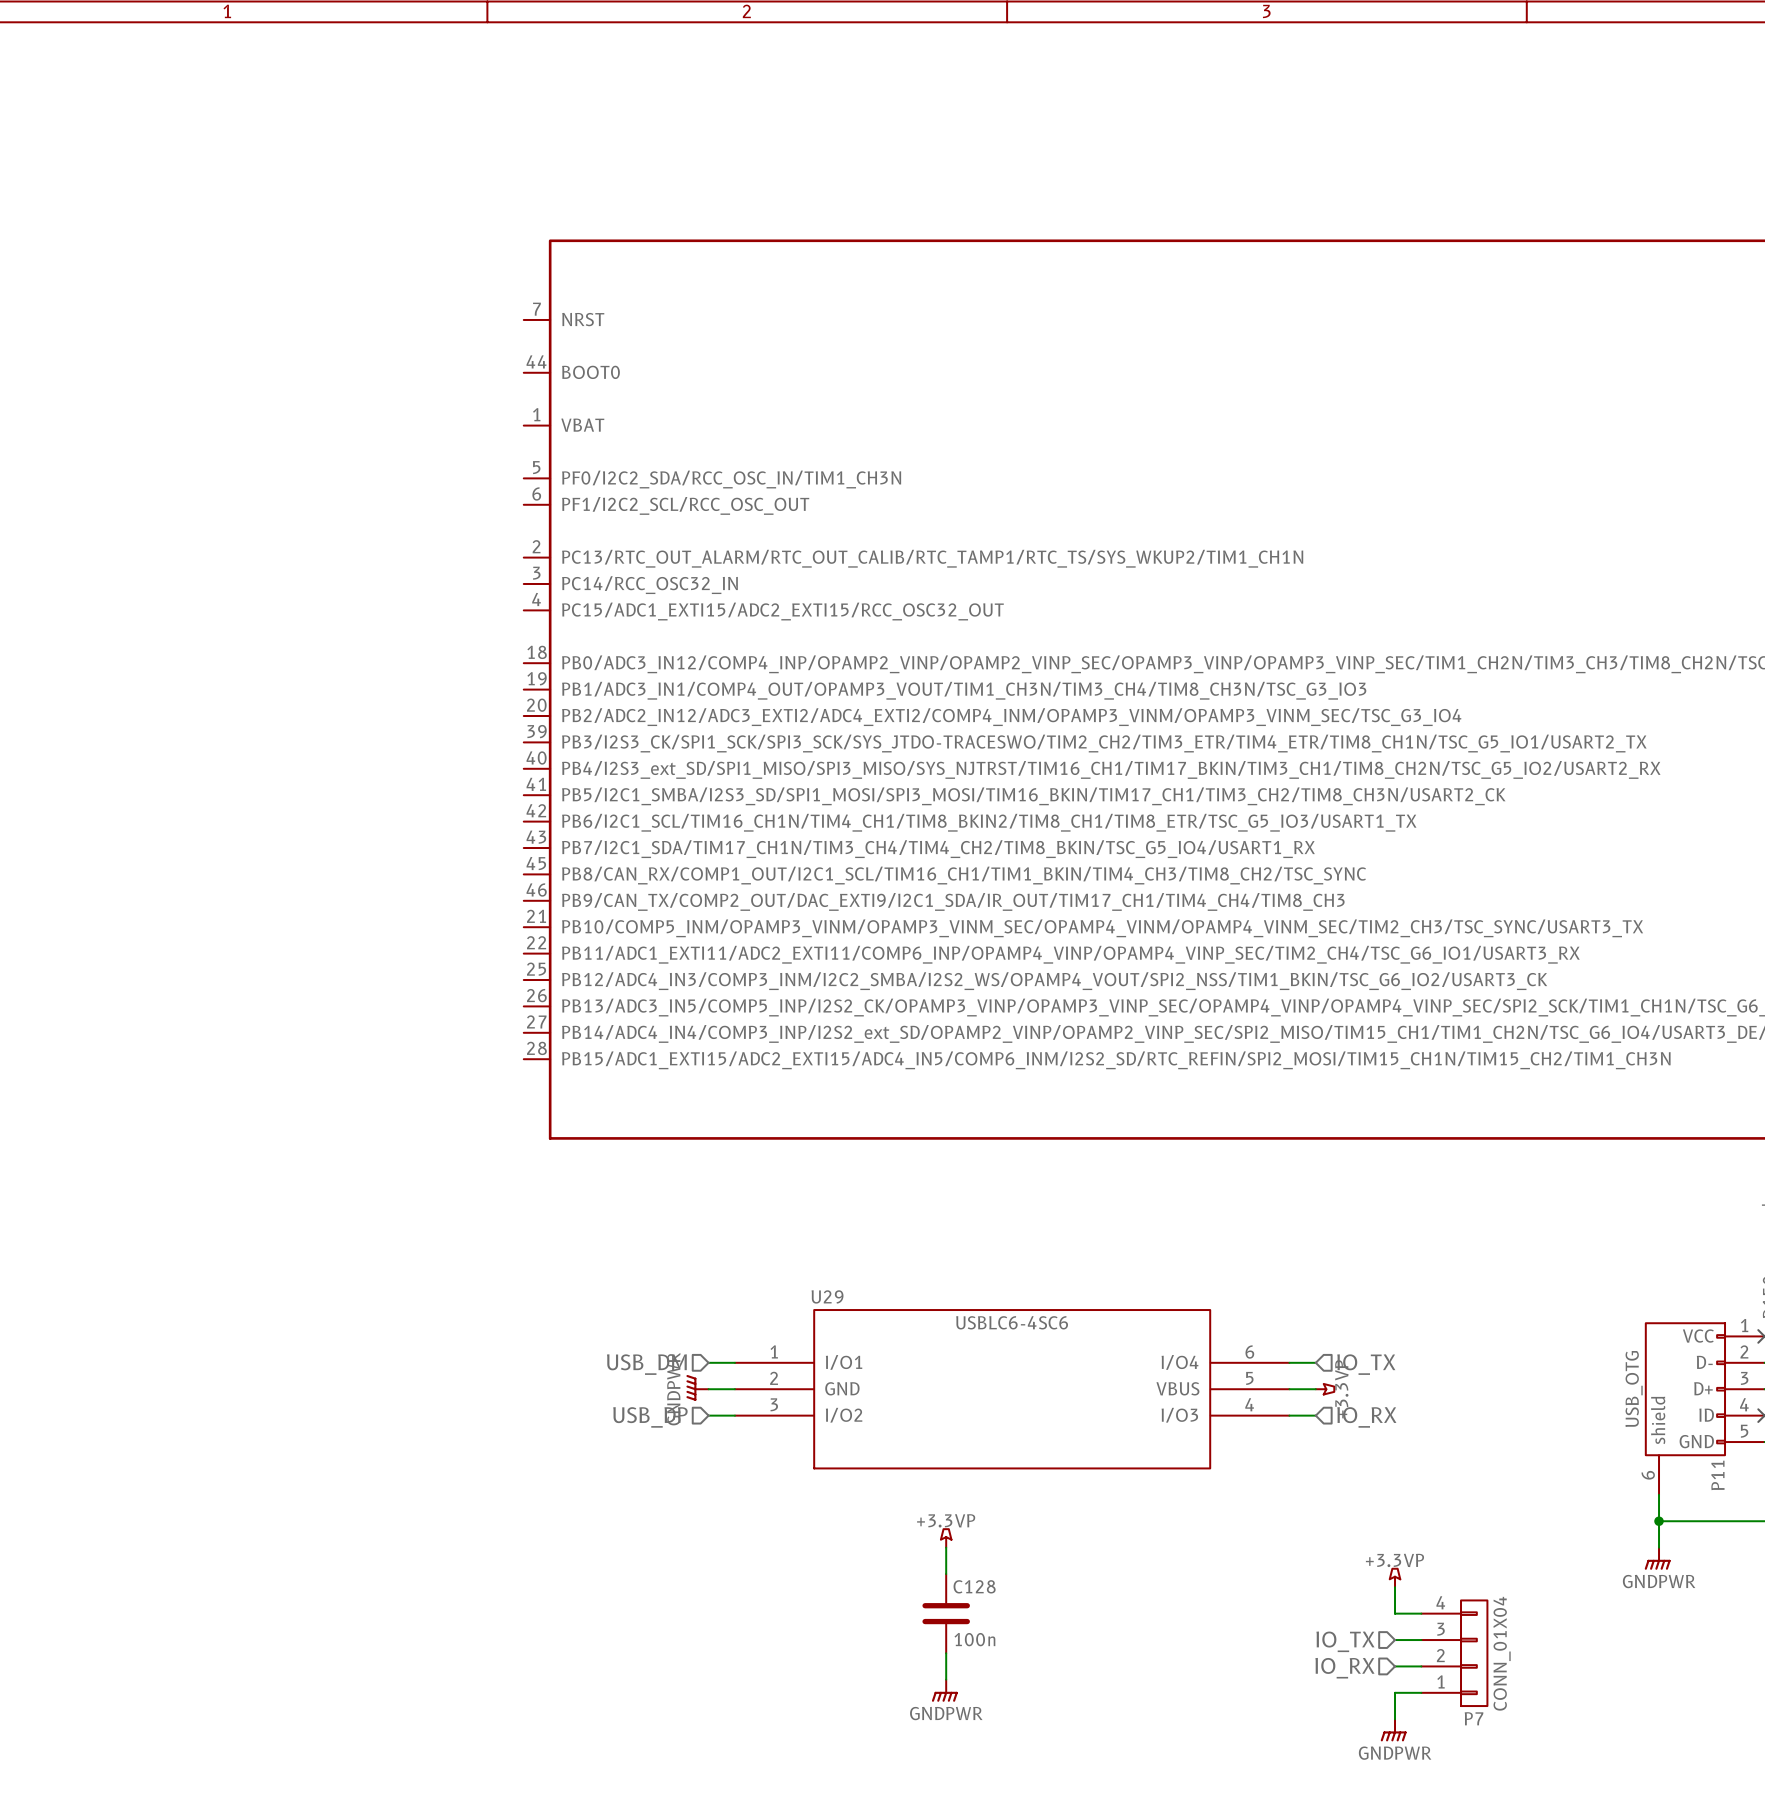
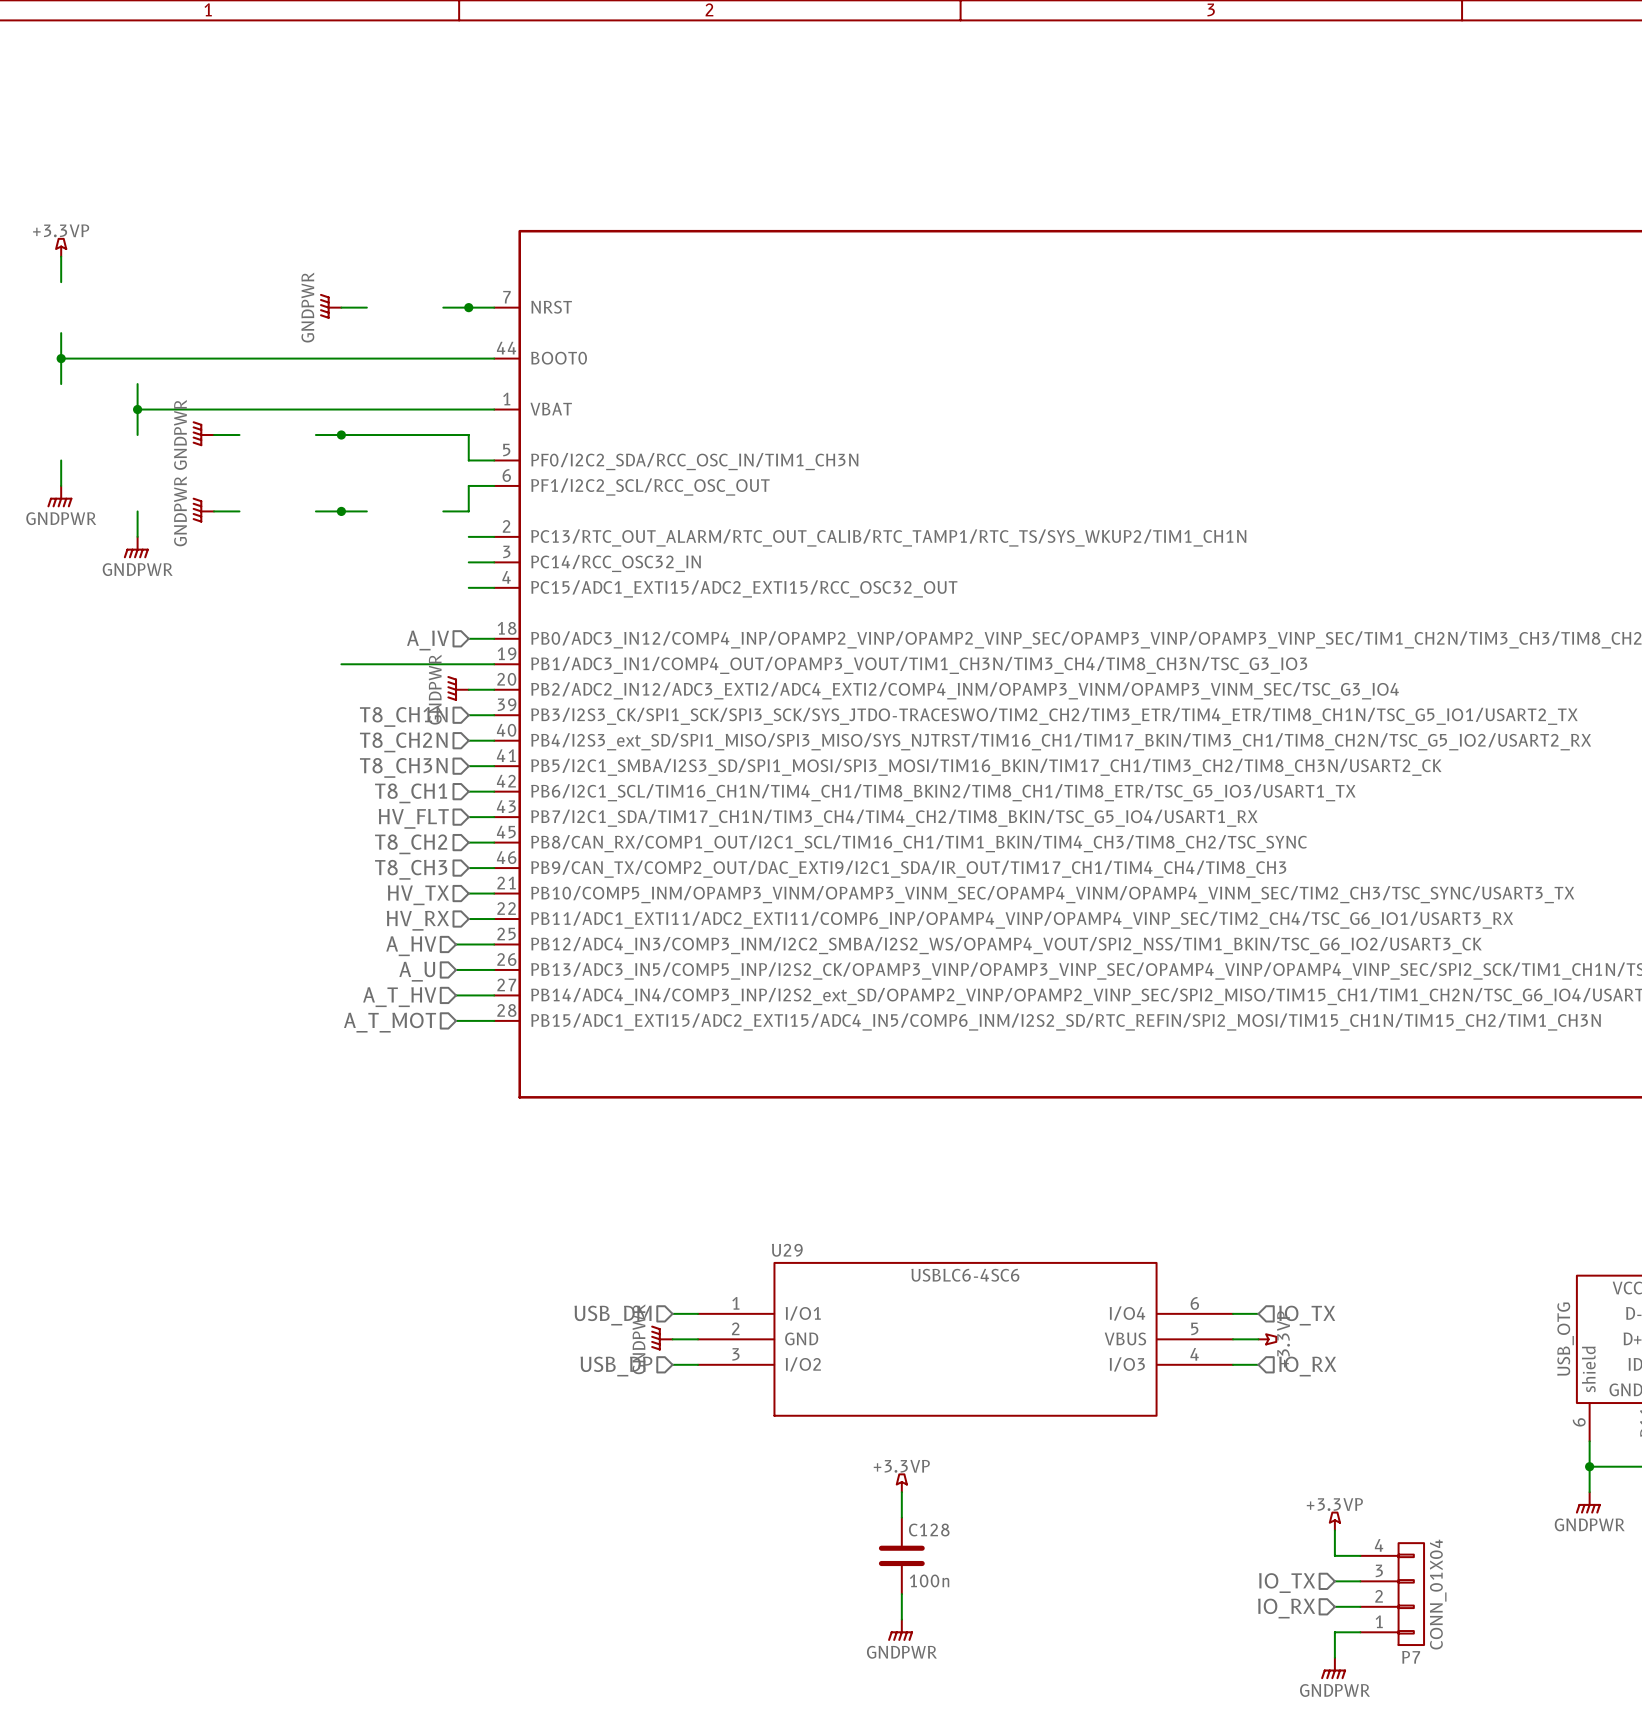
power symbol: none -> +3.3VP (61, 247)
wire: none -> (61, 256) (61, 282)
power symbol: none -> GNDPWR (330, 306)
wire: none -> (341, 307) (366, 307)
wire: none -> (443, 307) (494, 307)
junction: none -> (468, 307)
wire: none -> (61, 333) (61, 384)
wire: none -> (61, 358) (494, 358)
junction: none -> (61, 358)
wire: none -> (137, 384) (137, 435)
wire: none -> (137, 409) (494, 409)
junction: none -> (137, 409)
power symbol: none -> GNDPWR (203, 433)
wire: none -> (214, 435) (239, 435)
wire: none -> (315, 435) (468, 435) (468, 460) (494, 460)
junction: none -> (341, 435)
wire: none -> (61, 460) (61, 485)
wire: none -> (494, 485) (468, 485) (468, 511) (443, 511)
power symbol: none -> GNDPWR (59, 496)
power symbol: none -> GNDPWR (203, 510)
wire: none -> (137, 511) (137, 536)
wire: none -> (214, 511) (239, 511)
wire: none -> (315, 511) (366, 511)
junction: none -> (341, 511)
wire: none -> (468, 536) (494, 536)
power symbol: none -> GNDPWR (136, 547)
wire: none -> (468, 562) (494, 562)
wire: none -> (468, 587) (494, 587)
wire: none -> (468, 638) (494, 638)
hierarchical label: none -> A_IV (428, 640)
wire: none -> (341, 664) (494, 664)
power symbol: none -> GNDPWR (458, 688)
wire: none -> (468, 689) (494, 689)
wire: none -> (468, 715) (494, 715)
hierarchical label: none -> T8_CH1N (403, 716)
wire: none -> (468, 740) (494, 740)
hierarchical label: none -> T8_CH2N (403, 742)
wire: none -> (468, 766) (494, 766)
hierarchical label: none -> T8_CH3N (403, 767)
wire: none -> (468, 791) (494, 791)
hierarchical label: none -> T8_CH1 (411, 793)
wire: none -> (468, 817) (494, 817)
hierarchical label: none -> HV_FLT (413, 818)
wire: none -> (468, 842) (494, 842)
hierarchical label: none -> T8_CH2 (411, 844)
wire: none -> (468, 868) (494, 868)
hierarchical label: none -> T8_CH3 (411, 869)
wire: none -> (468, 893) (494, 893)
hierarchical label: none -> HV_TX (418, 895)
wire: none -> (468, 919) (494, 919)
hierarchical label: none -> HV_RX (417, 920)
wire: none -> (456, 944) (494, 944)
hierarchical label: none -> A_HV (411, 946)
wire: none -> (456, 969) (494, 969)
hierarchical label: none -> A_U (417, 971)
wire: none -> (456, 995) (494, 995)
hierarchical label: none -> A_T_HV (399, 997)
wire: none -> (456, 1020) (494, 1020)
hierarchical label: none -> A_T_MOT (390, 1022)

